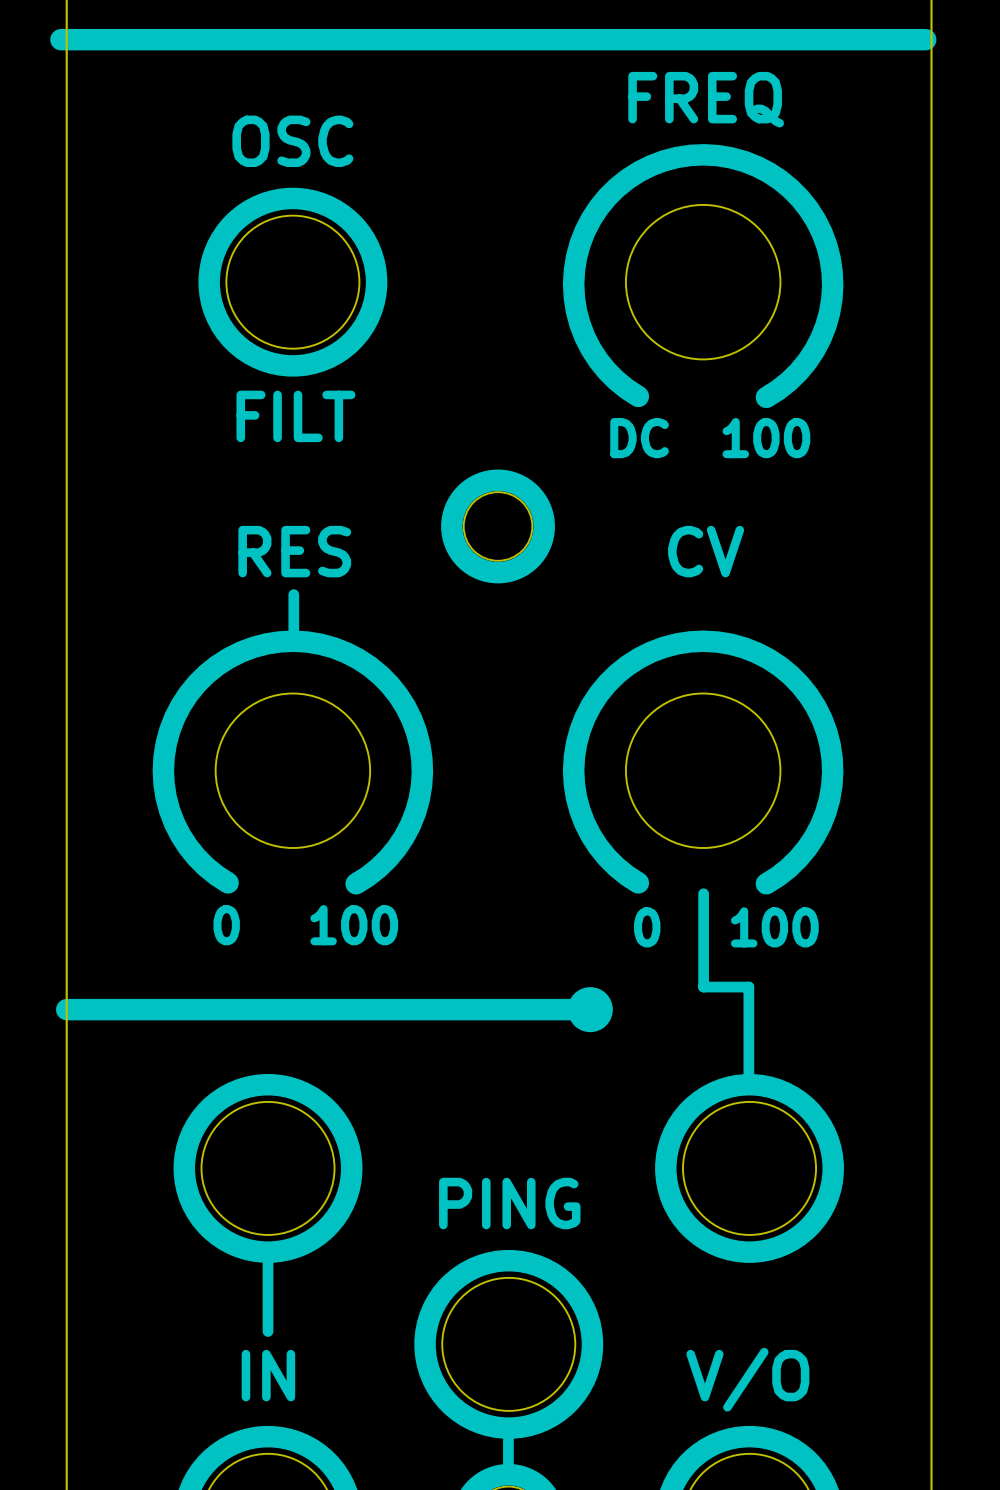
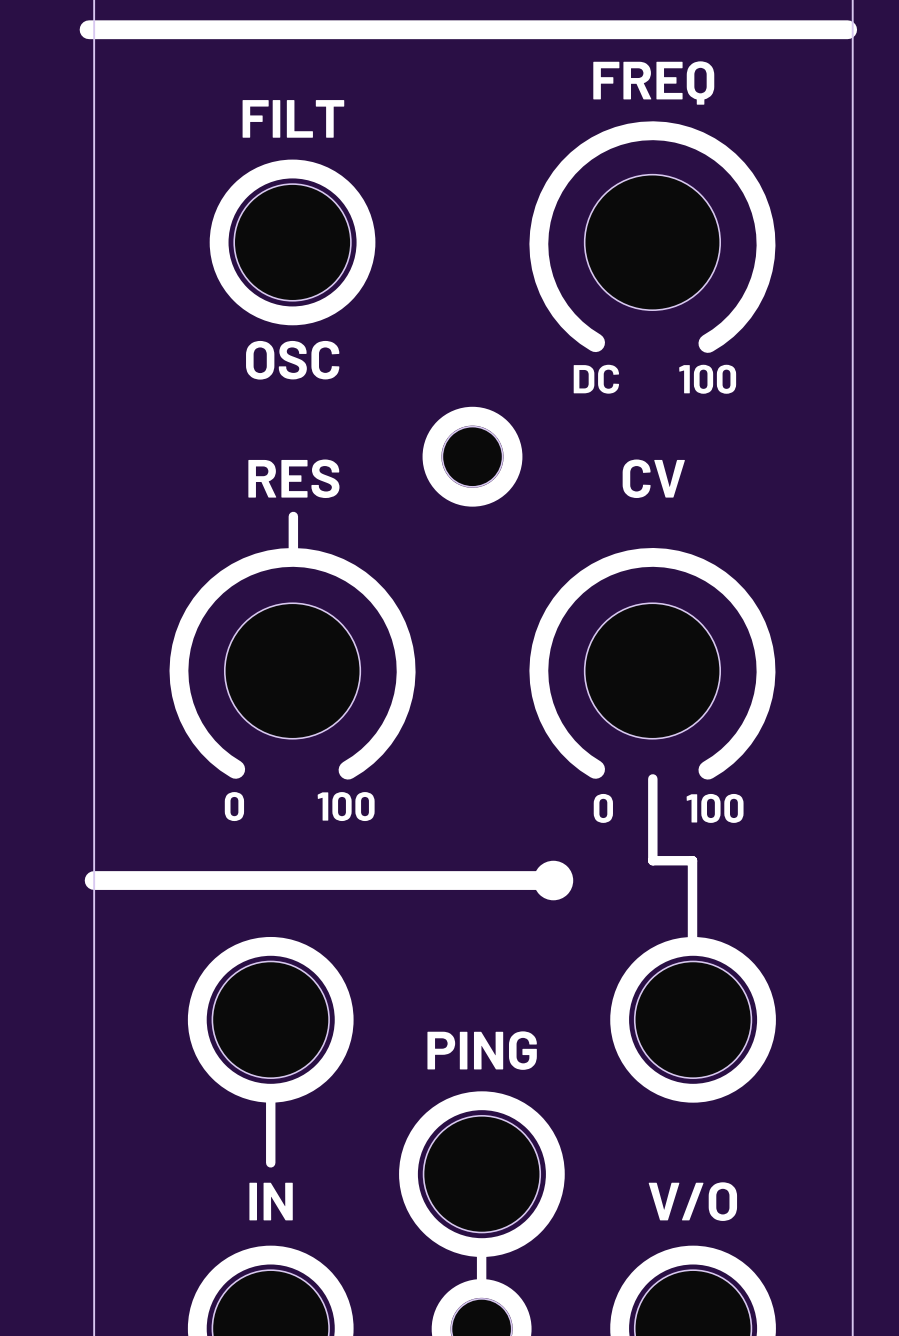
text: OSC (292, 141) -> FILT (293, 118)
text: FILT (295, 416) -> OSC (292, 360)

